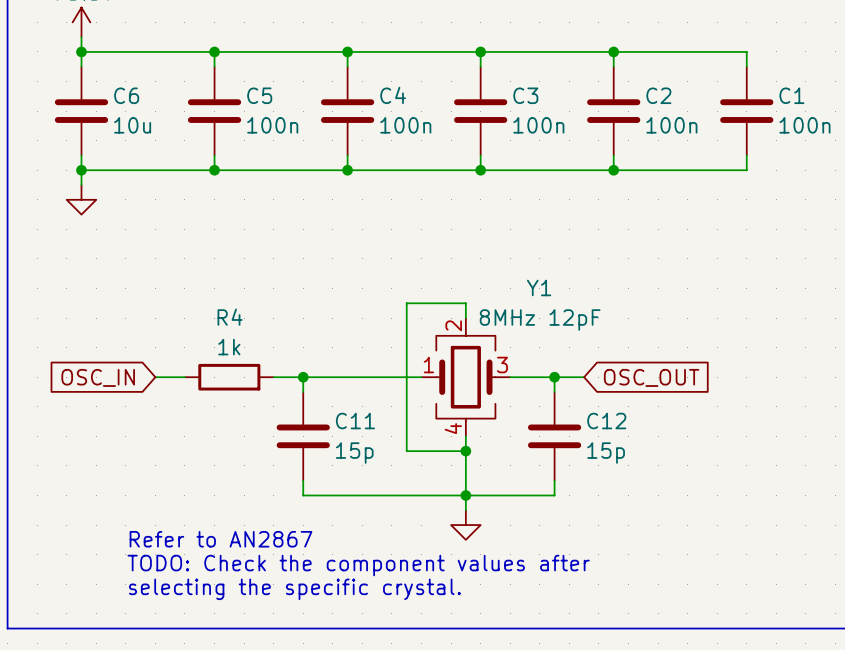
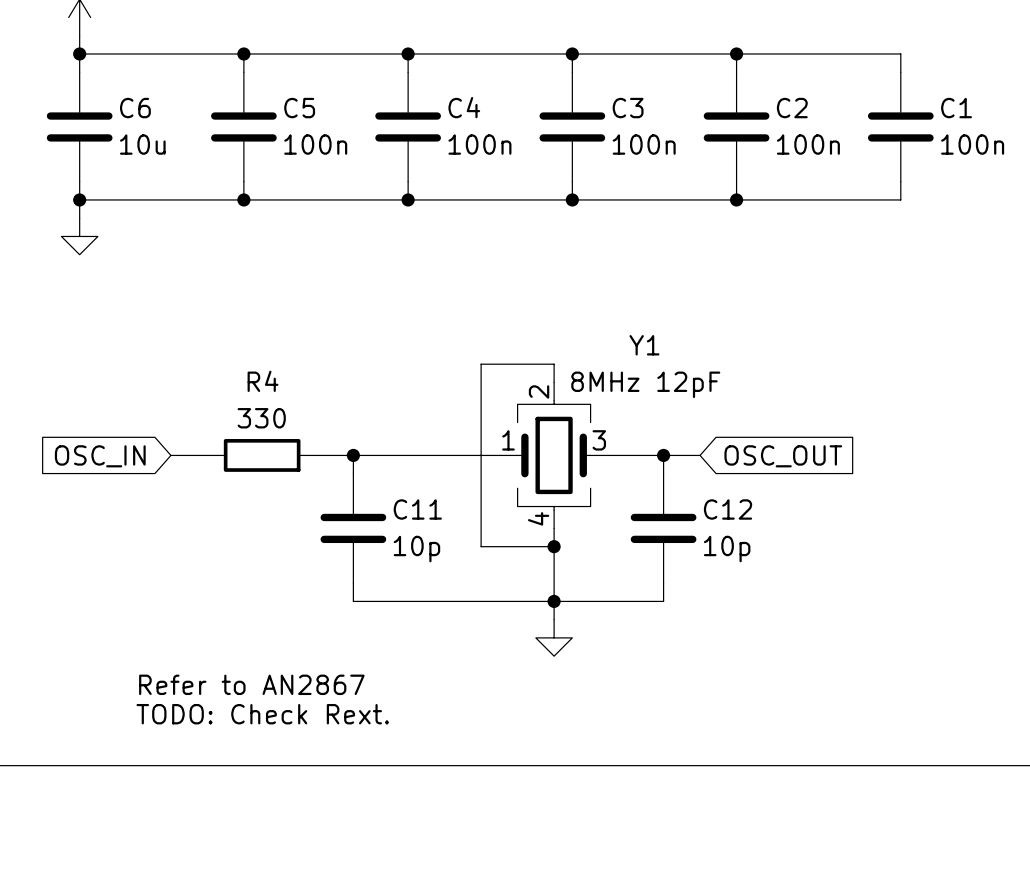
R4 value: 1k (229, 347) -> 330 (261, 418)
C11 value: 15p (354, 453) -> 10p (416, 549)
C12 value: 15p (606, 453) -> 10p (727, 549)
text: Refer to AN2867 (220, 539) -> none
text: TODO: Check the component values after (358, 565) -> Refer to AN2867 (251, 684)
text: selecting the specific crystal. (294, 589) -> TODO: Check Rext. (262, 714)

